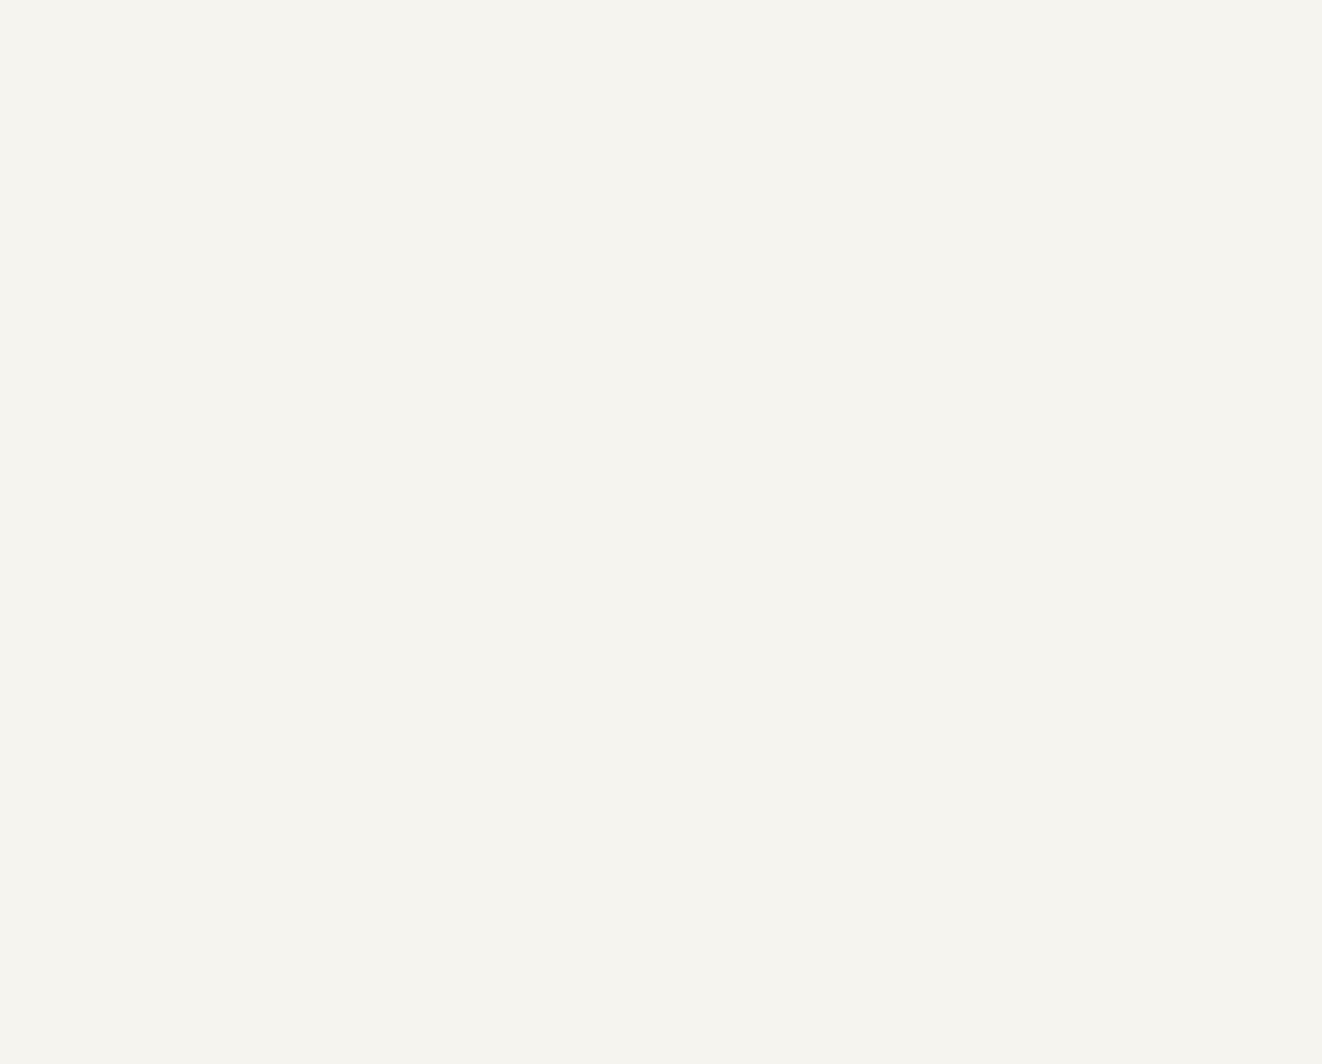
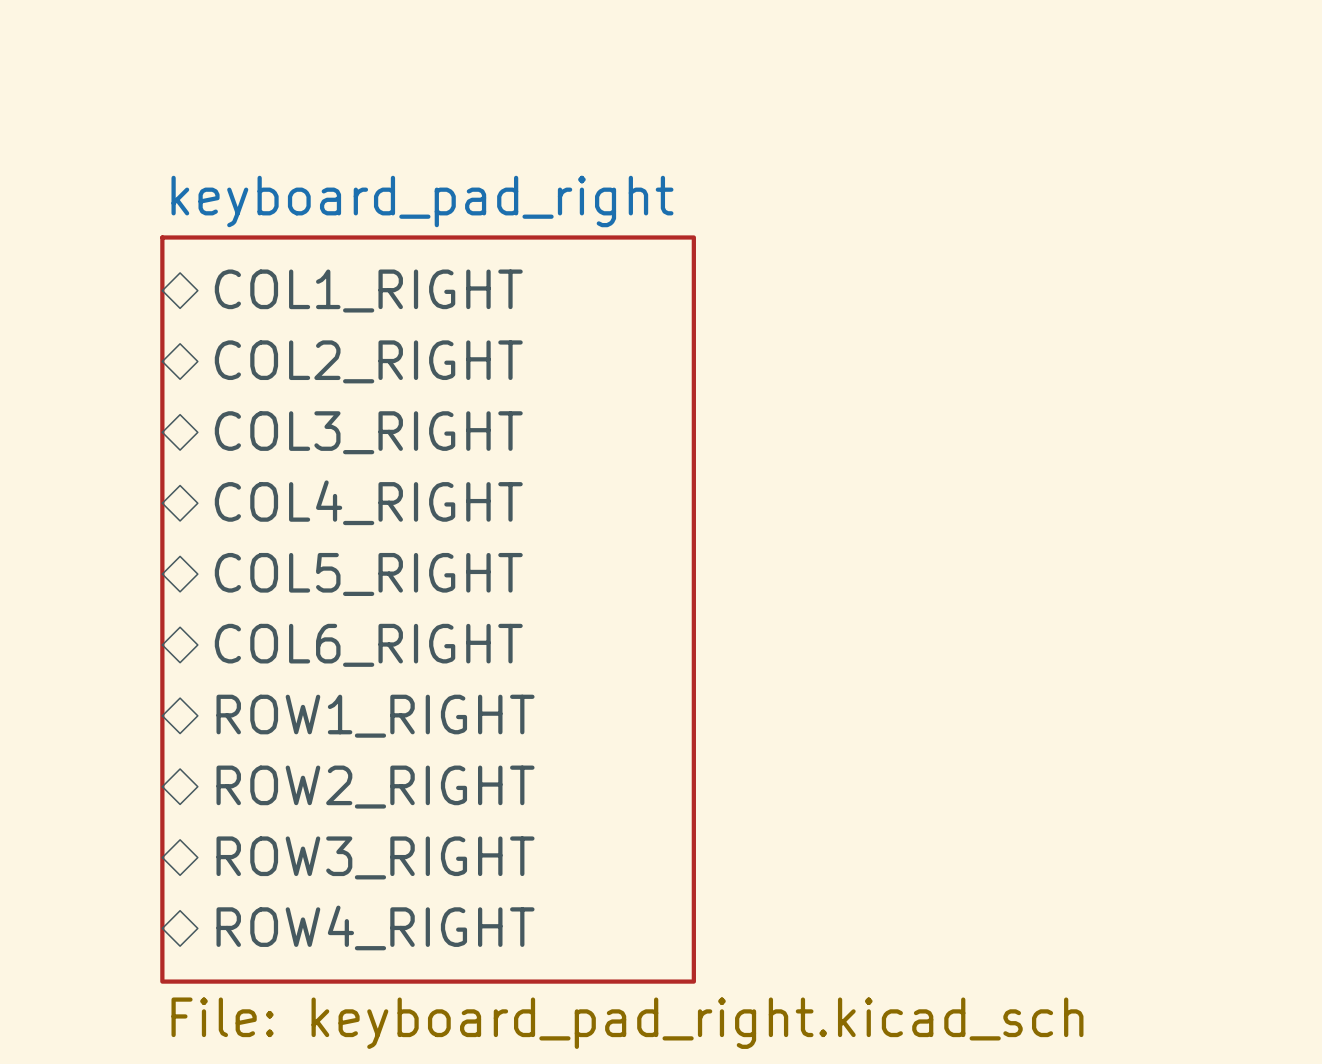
sheet pin: none -> COL1_RIGHT (368, 291)
sheet pin: none -> COL2_RIGHT (368, 361)
sheet pin: none -> COL3_RIGHT (368, 432)
sheet pin: none -> COL4_RIGHT (368, 502)
sheet pin: none -> COL5_RIGHT (368, 574)
sheet keyboard_pad_right: none -> File: keyboard_pad_right.kicad_sch (428, 609)
sheet pin: none -> COL6_RIGHT (368, 645)
sheet pin: none -> ROW1_RIGHT (375, 716)
sheet pin: none -> ROW2_RIGHT (375, 787)
sheet pin: none -> ROW3_RIGHT (375, 857)
sheet pin: none -> ROW4_RIGHT (375, 927)

